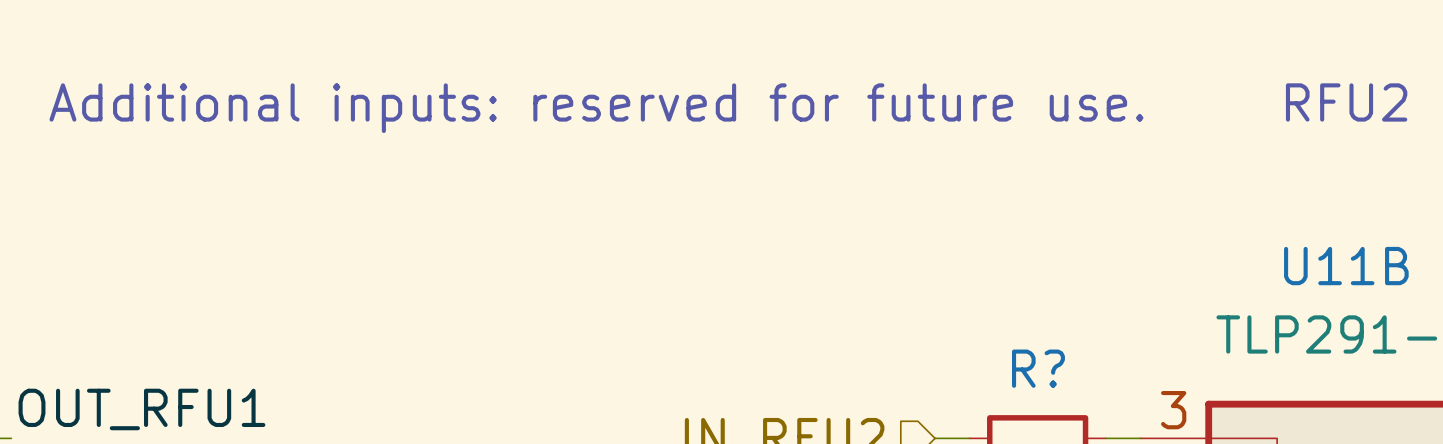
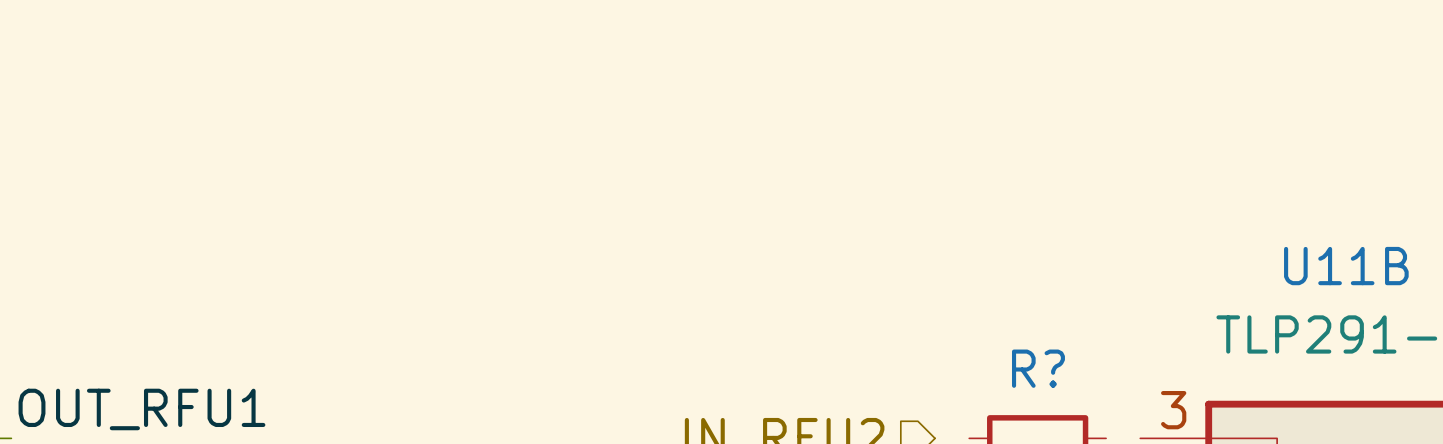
text: RFU2 (1346, 102) -> none
text: Additional inputs: reserved for future use. (596, 108) -> none
wire: (935, 438) (969, 438) -> none
wire: (1106, 438) (1140, 438) -> none

